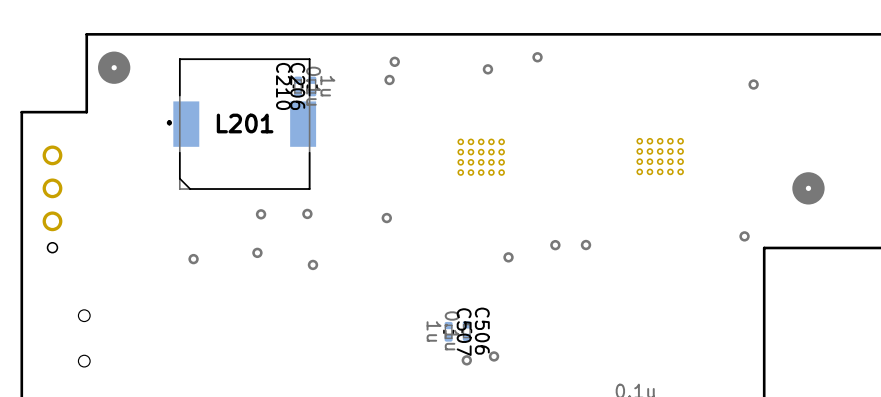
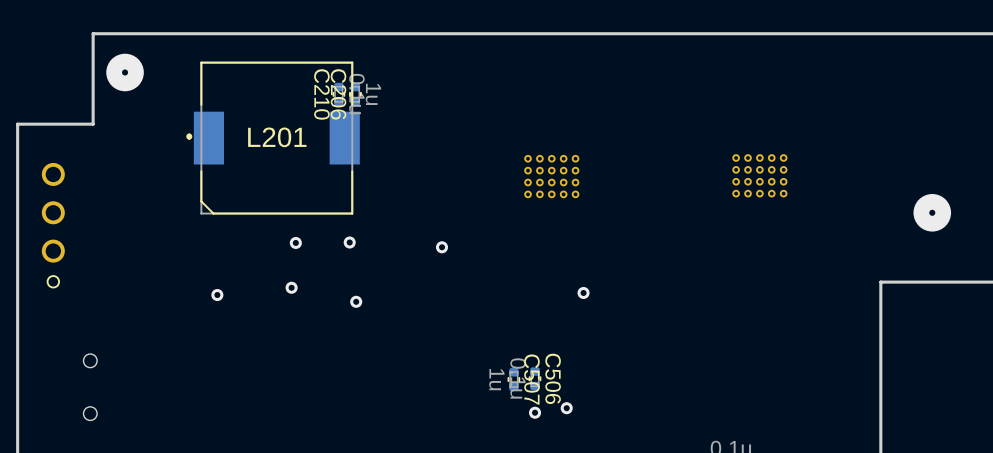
via: (537, 57) -> none
via: (394, 61) -> none
via: (487, 69) -> none
via: (389, 79) -> none
via: (753, 84) -> none
via: (744, 236) -> none
via: (555, 245) -> none
via: (586, 245) -> none

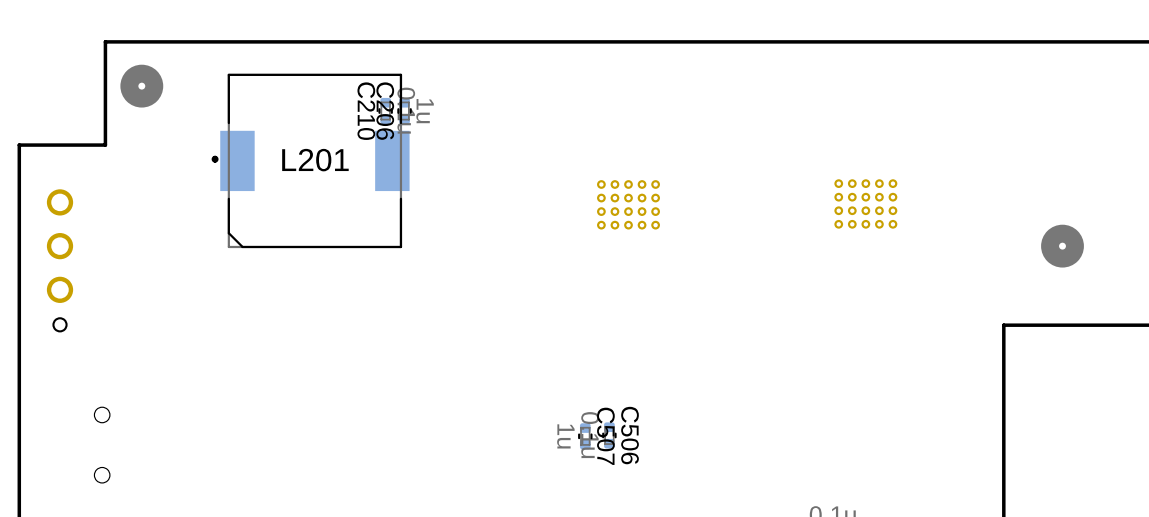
via: (295, 242) -> none
via: (349, 242) -> none
via: (442, 247) -> none
via: (291, 287) -> none
via: (583, 292) -> none
via: (217, 295) -> none
via: (356, 301) -> none
via: (566, 408) -> none
via: (535, 412) -> none

